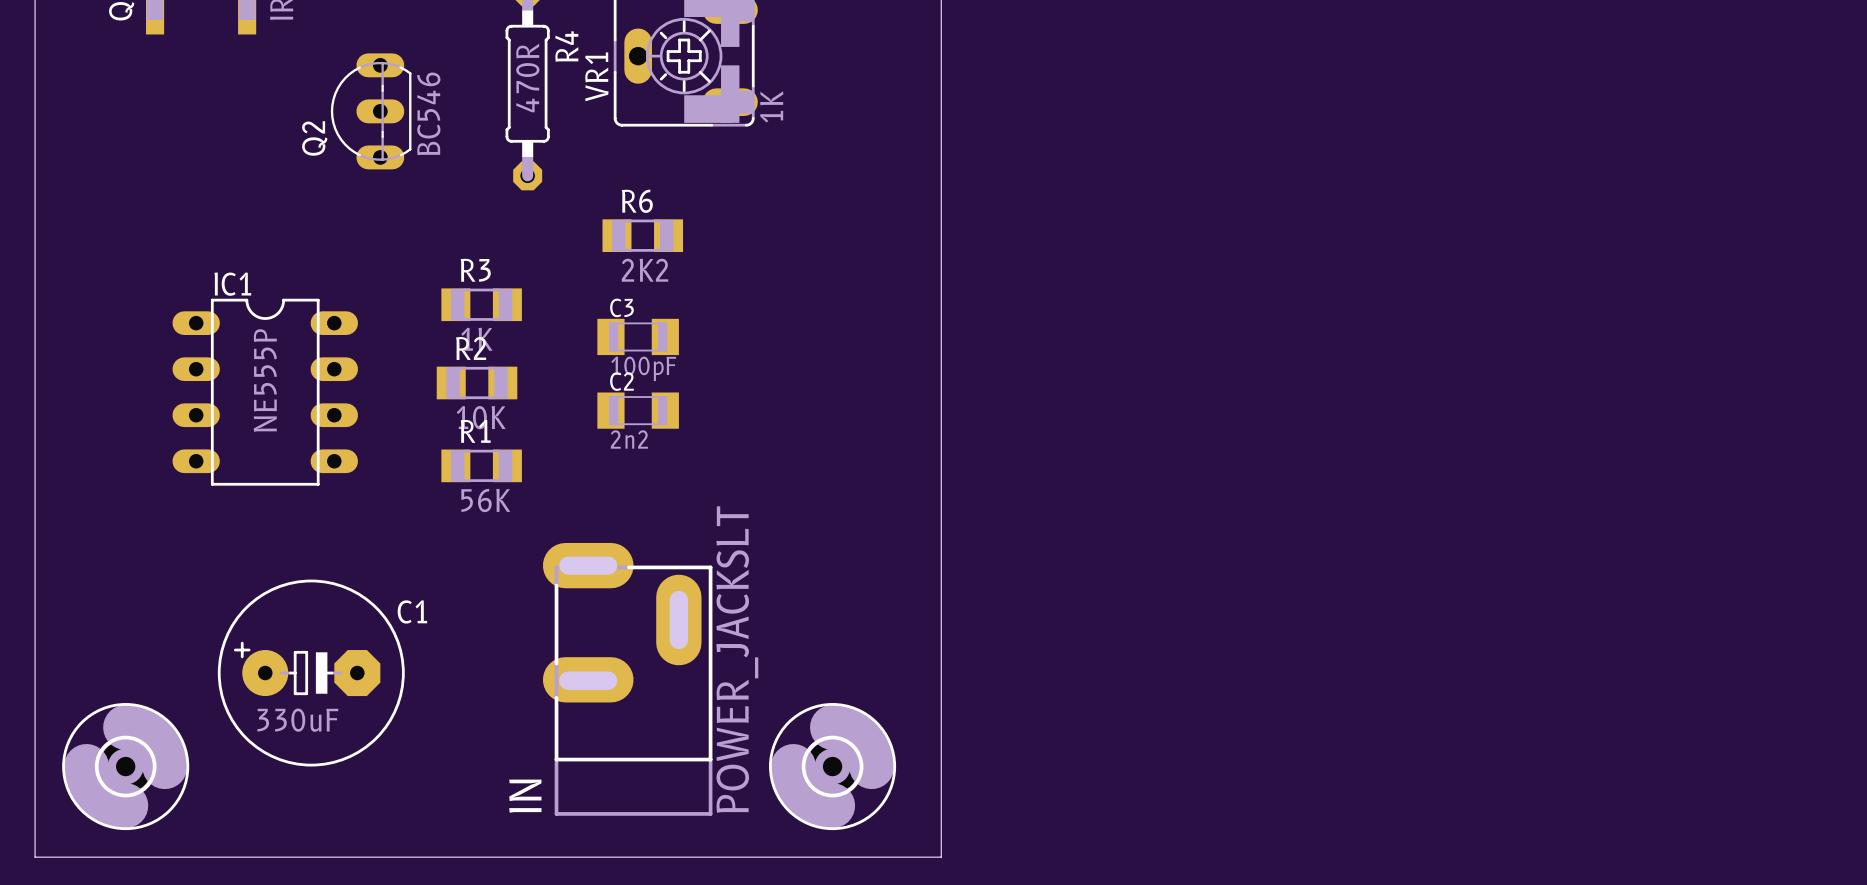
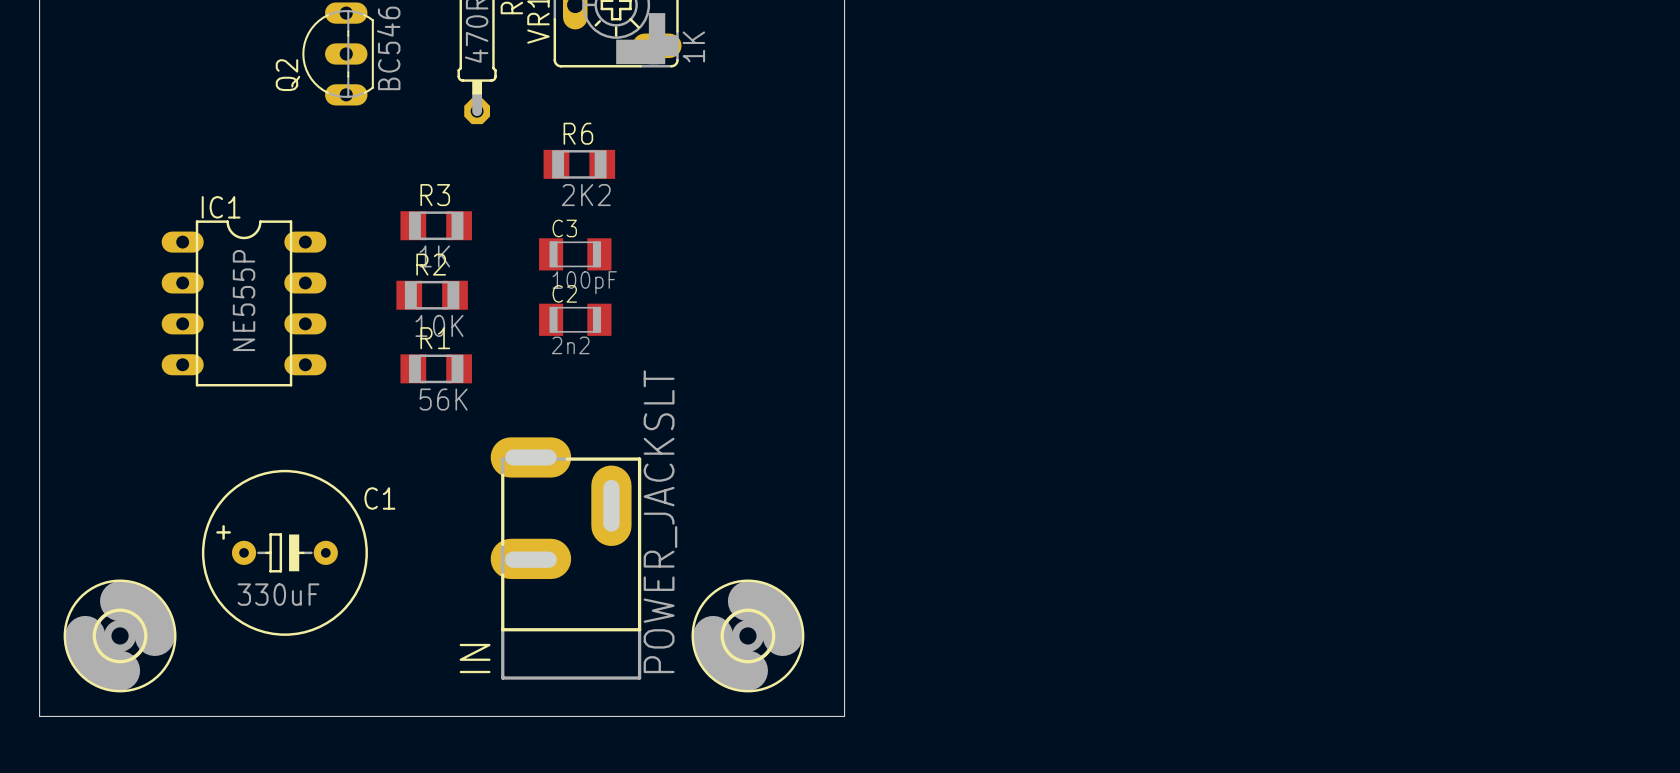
C1 footprint: [217, 579, 405, 767] -> [201, 469, 368, 636]

